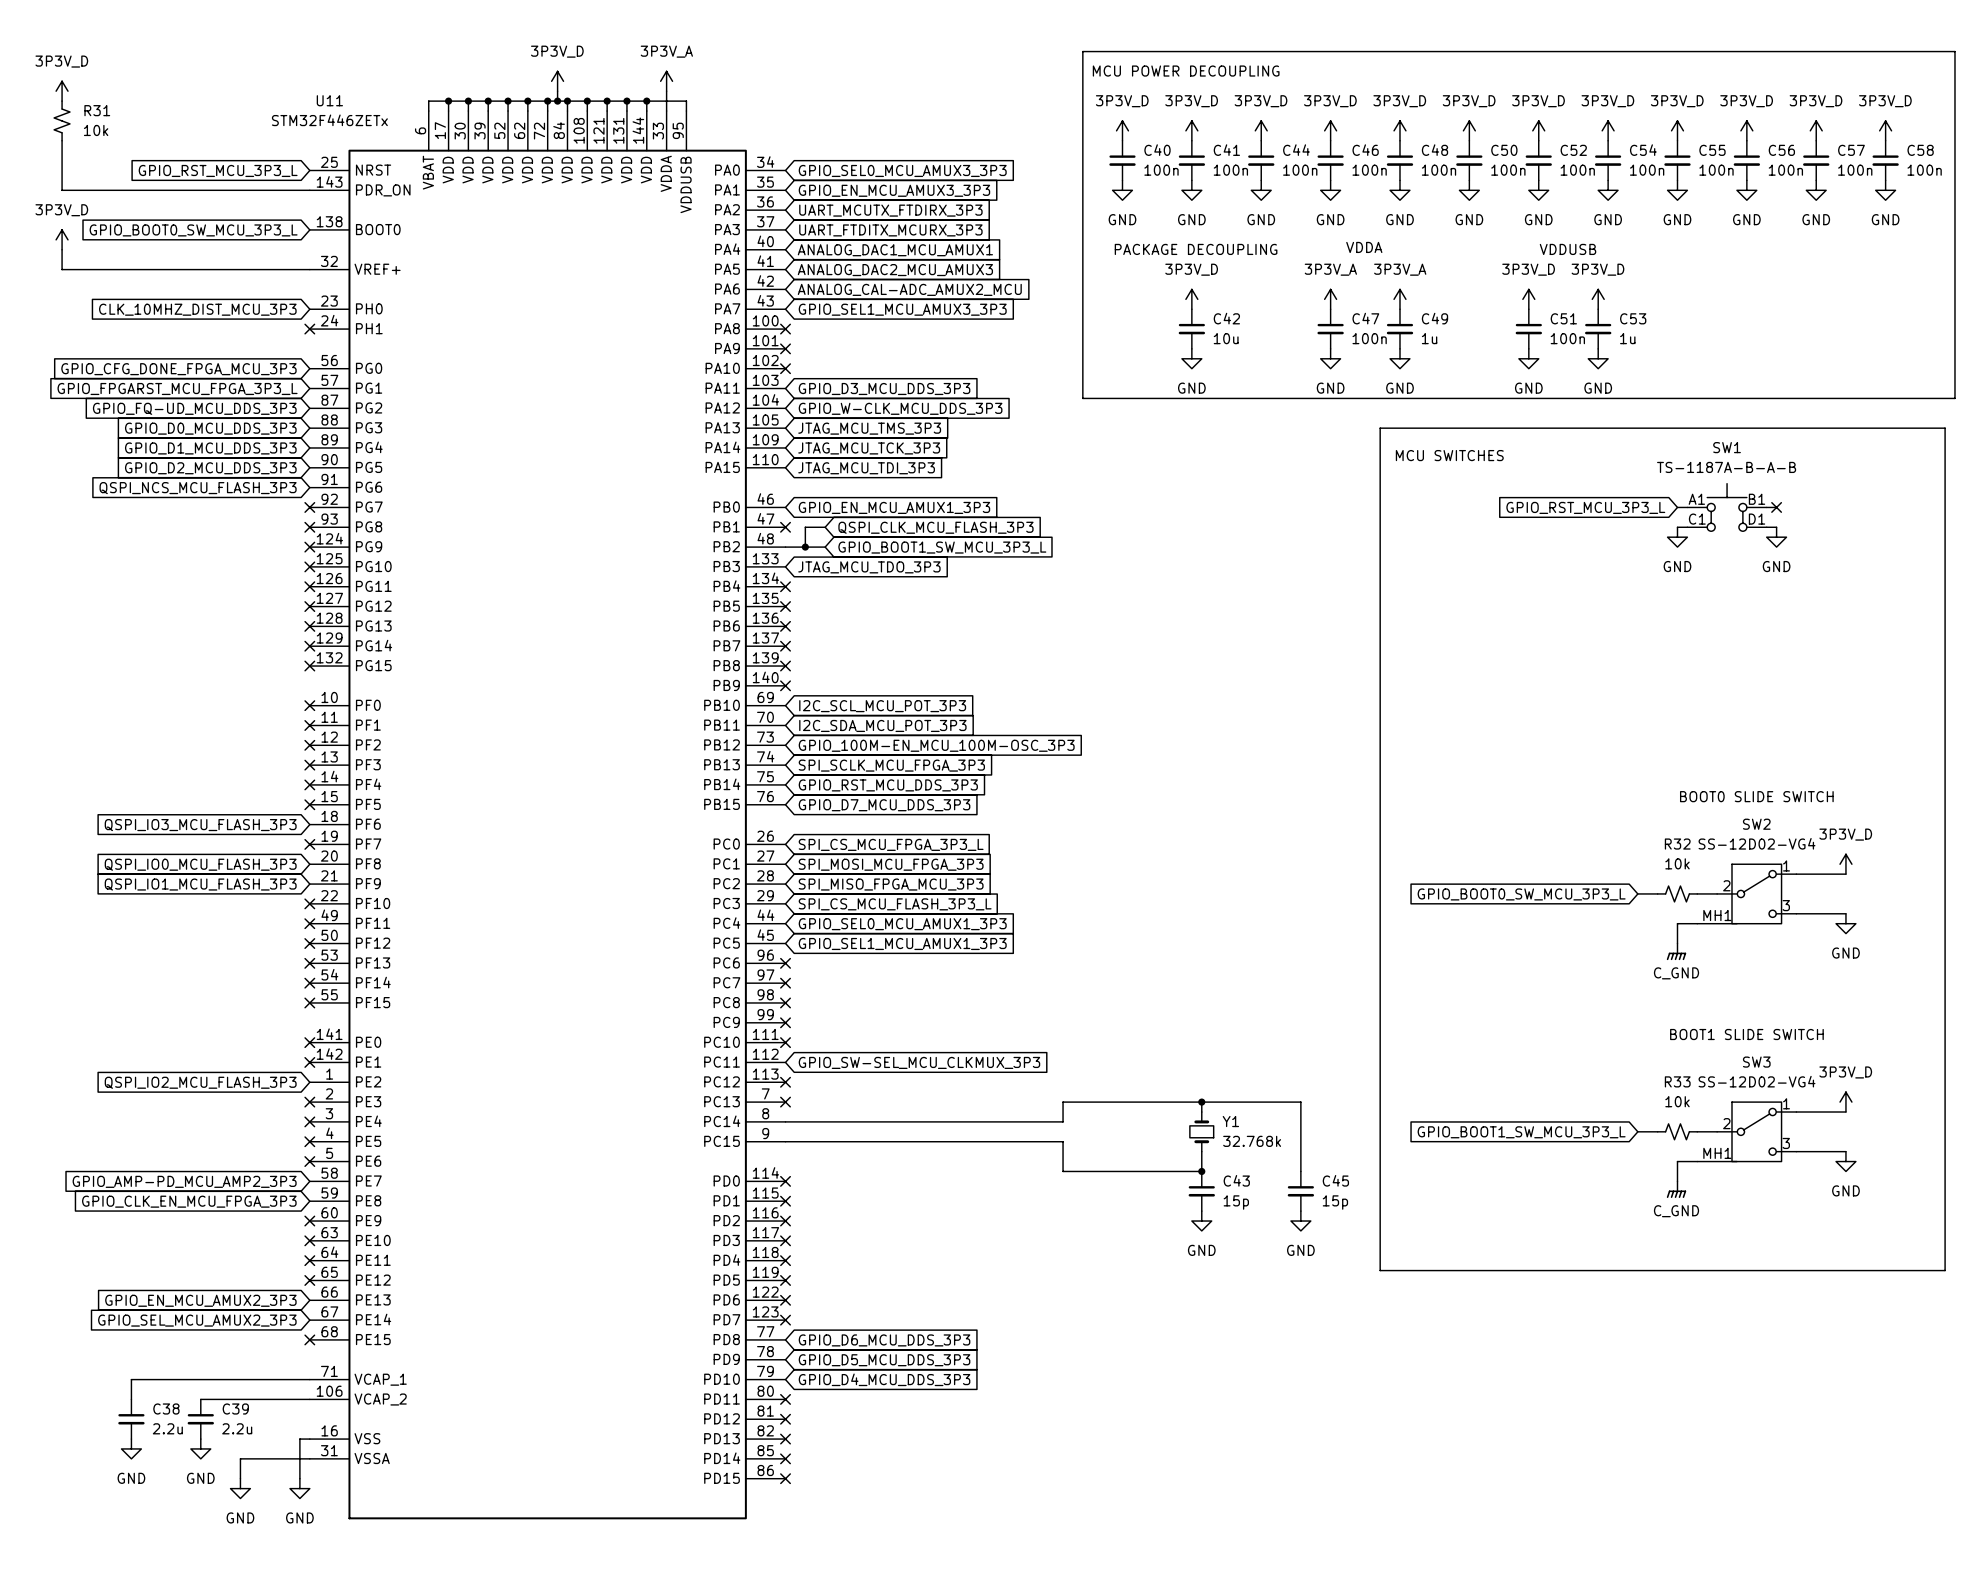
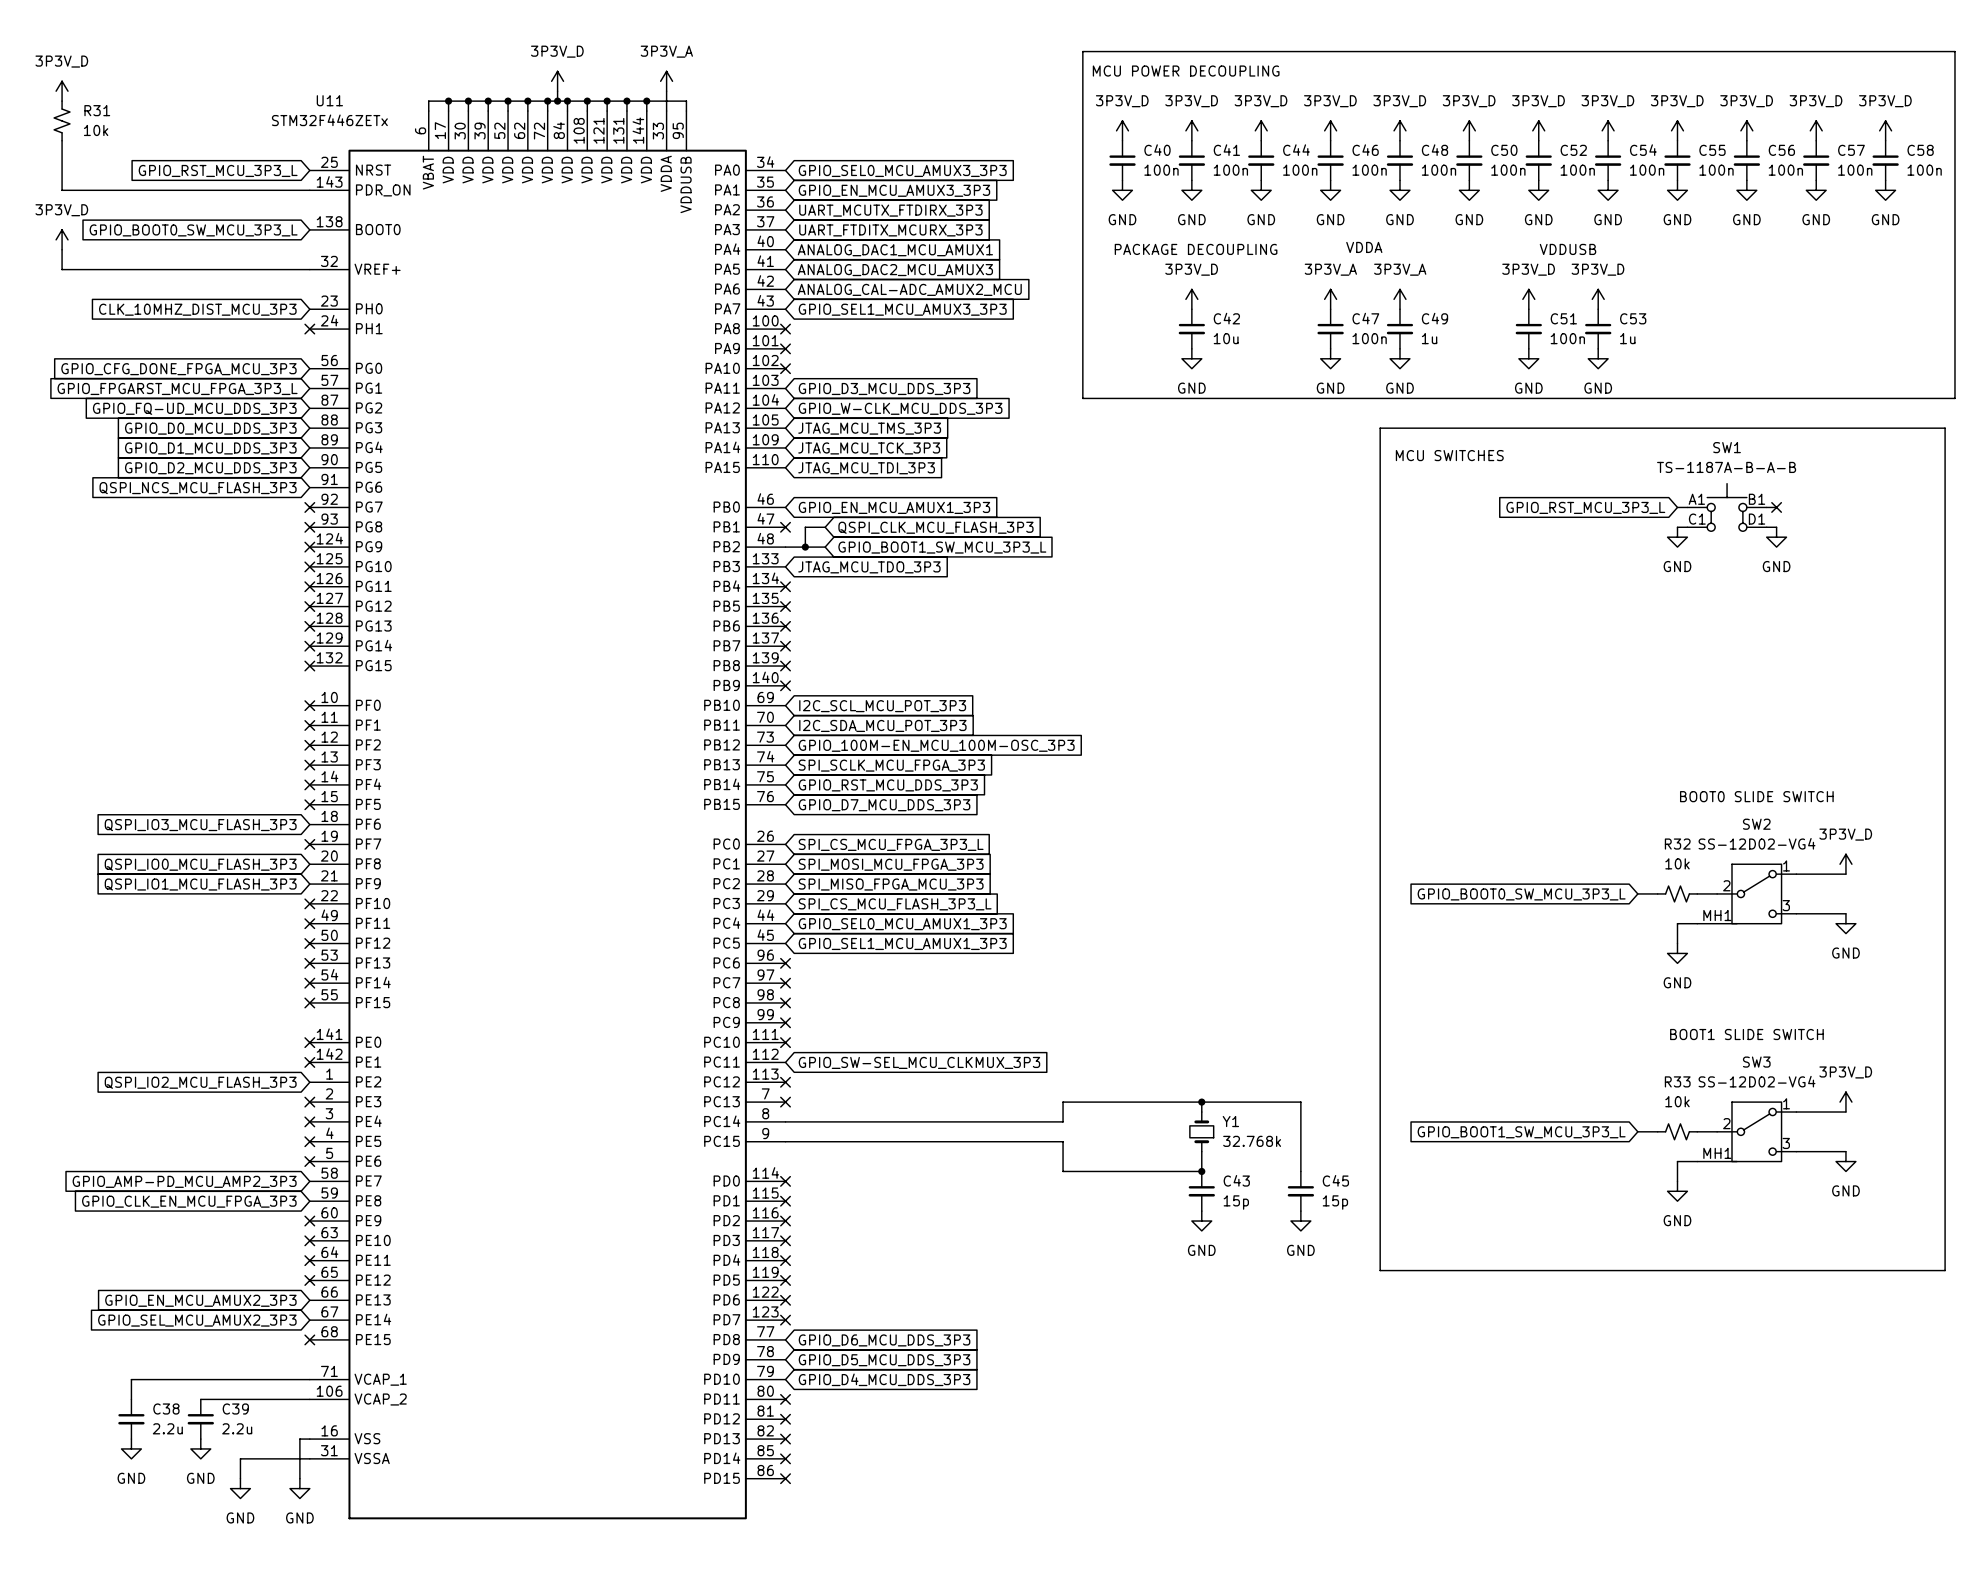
power symbol: C_GND (1676, 951) -> GND (1677, 953)
power symbol: C_GND (1676, 1189) -> GND (1677, 1191)

